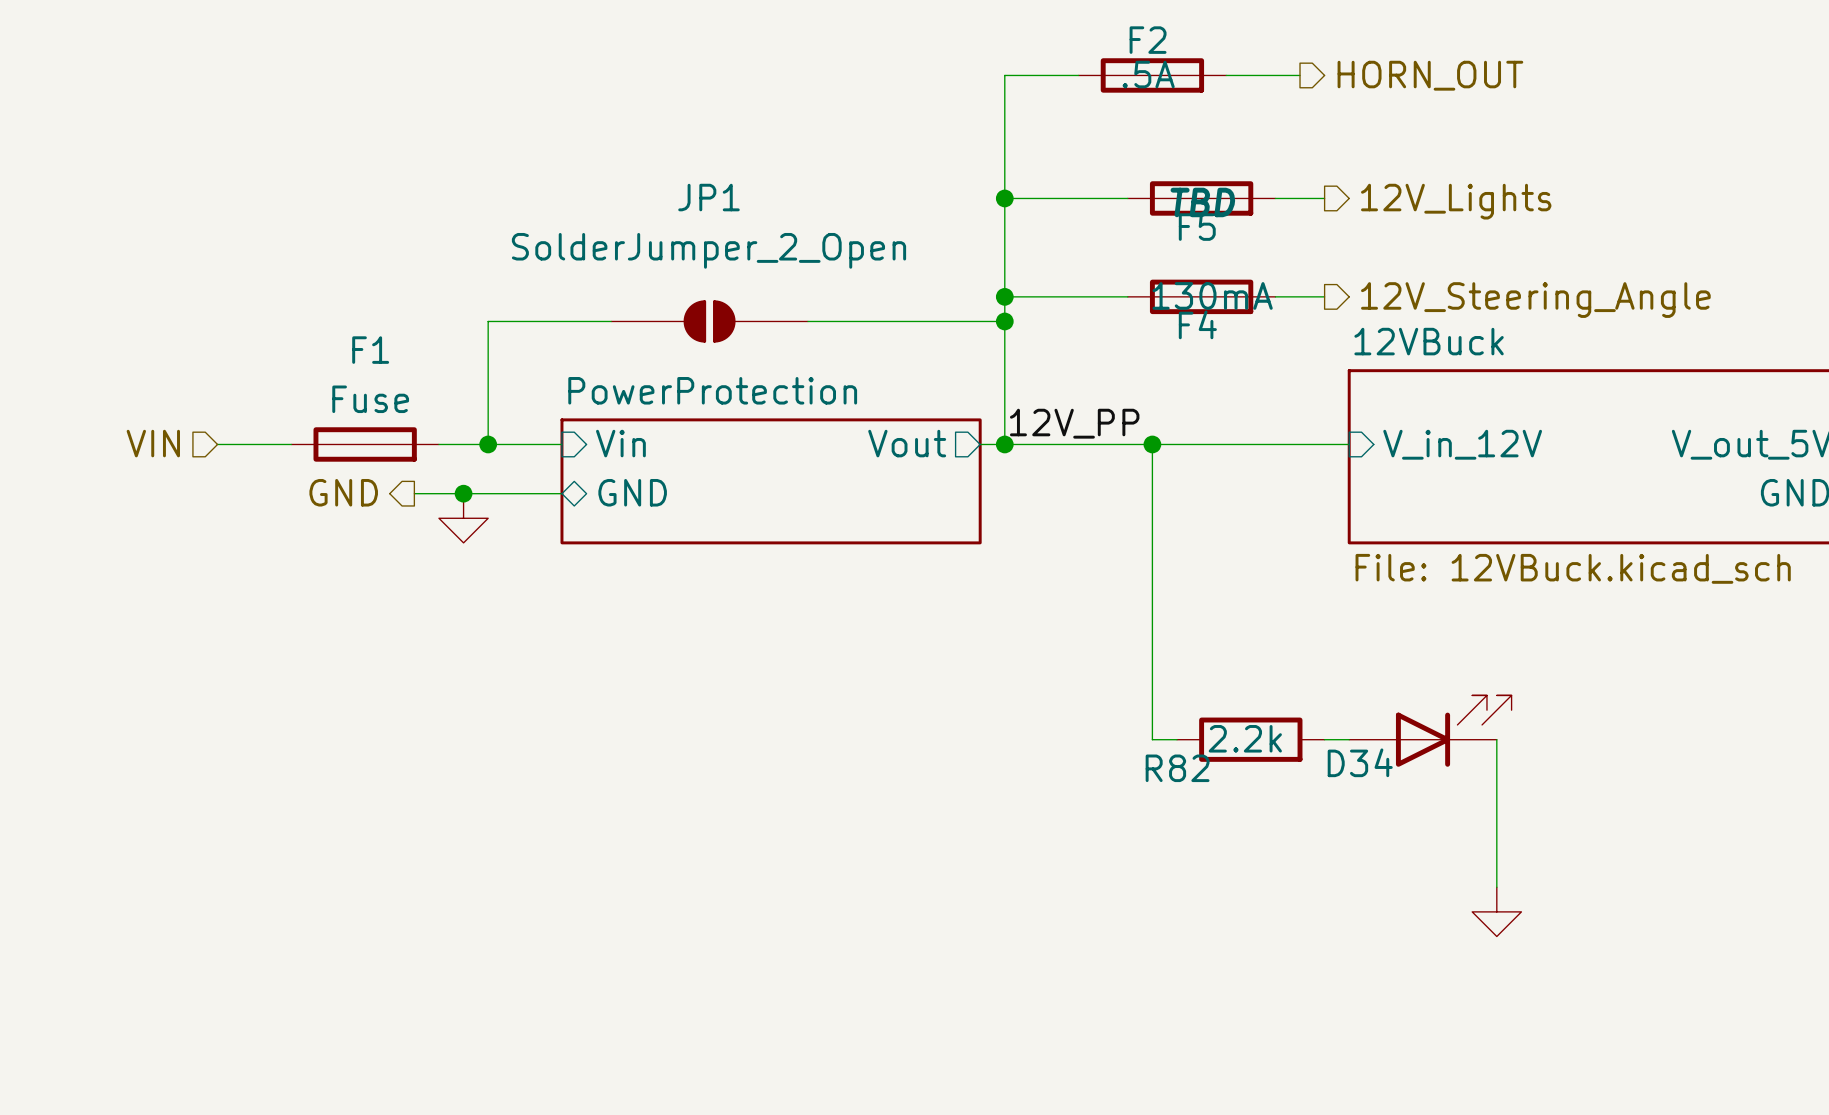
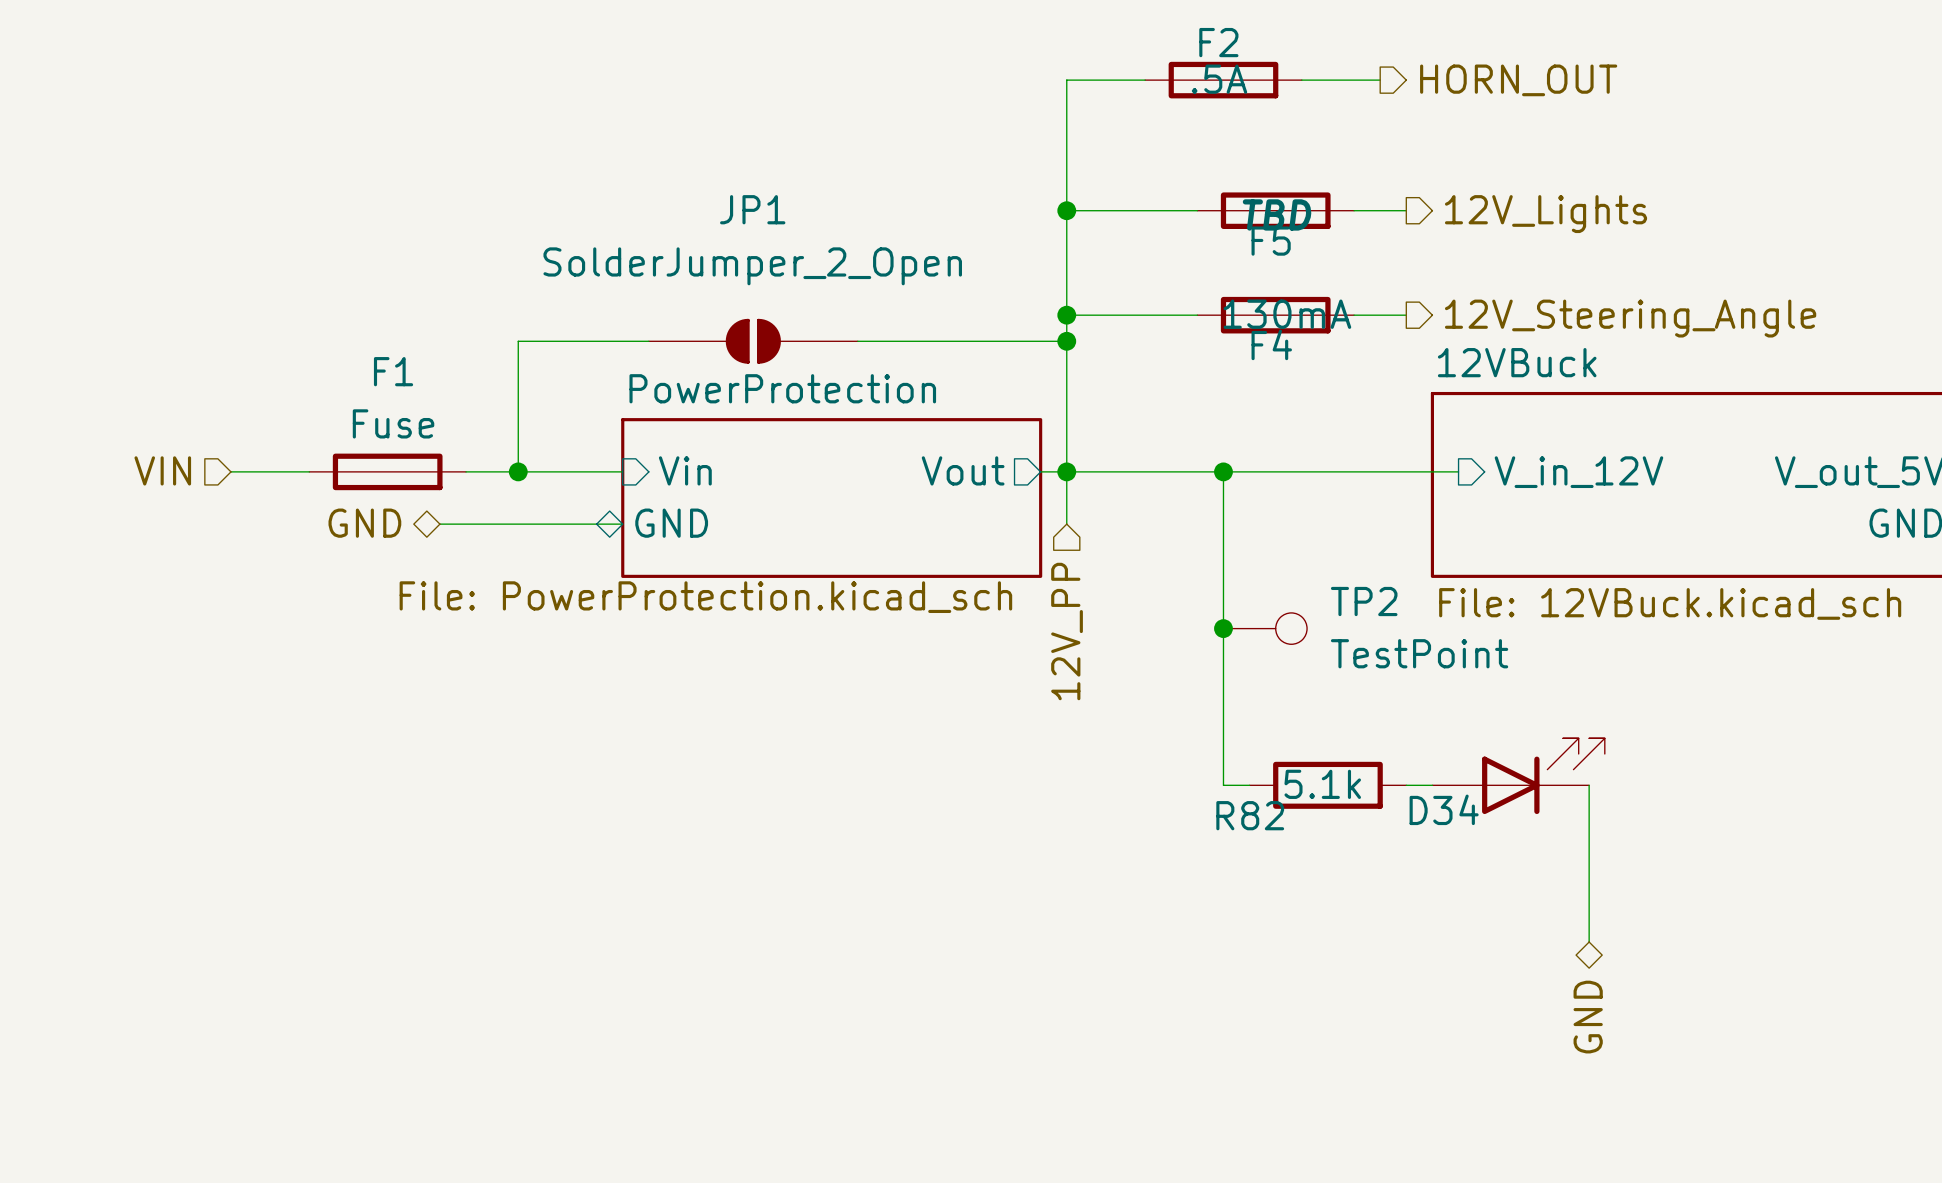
sheet PowerProtection shape: [560, 418, 982, 545] -> [621, 418, 1043, 578]
label: 12V_PP (1074, 423) -> none
sheet pin position: Vin (620, 443) -> Vin (685, 470)
wire: none -> (596, 471) (622, 471)
wire: none -> (1066, 471) (1066, 524)
wire: none -> (1432, 471) (1458, 471)
sheet pin position: V_in_12V (1462, 444) -> V_in_12V (1578, 472)
hierarchical label shape: output (343, 492) -> bidirectional (364, 523)
junction: (463, 493) -> none
wire: none -> (596, 524) (622, 524)
power symbol: (463, 518) -> none
sheet PowerProtection value: none -> File: PowerProtection.kicad_sch (705, 597)
junction: none -> (1223, 628)
TP2: none -> TestPoint (1265, 628)
hierarchical label: none -> 12V_PP (1067, 631)
R82 value: 2.2k (1245, 738) -> 5.1k (1322, 784)
power symbol: (1496, 911) -> none
hierarchical label: none -> GND (1588, 1017)

